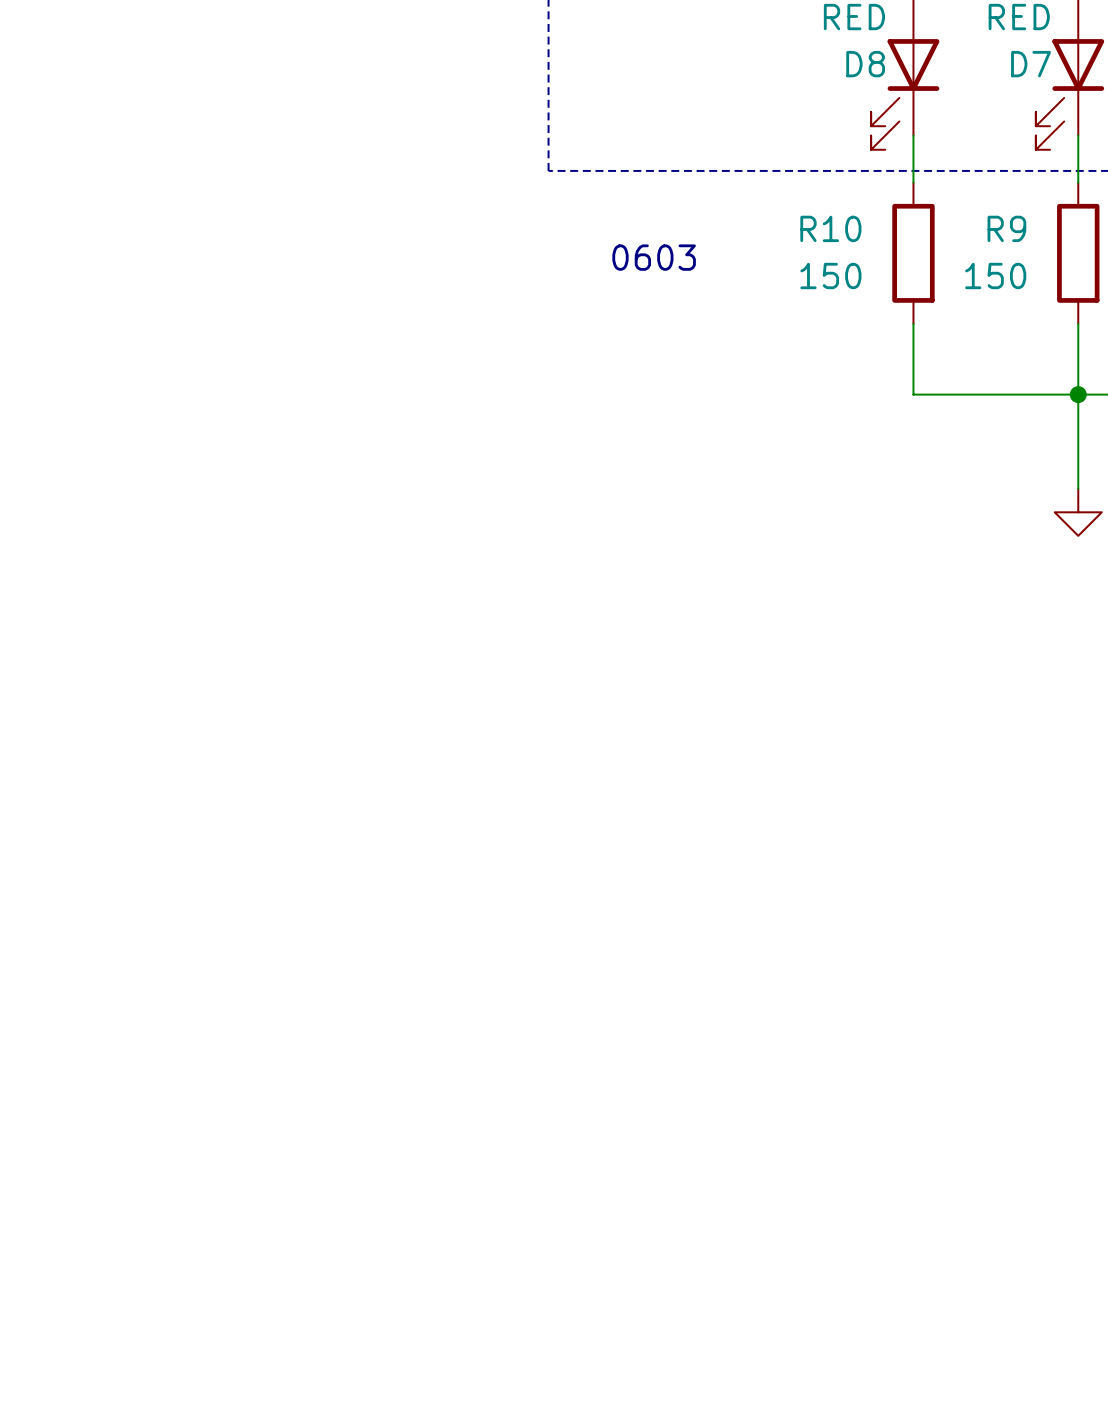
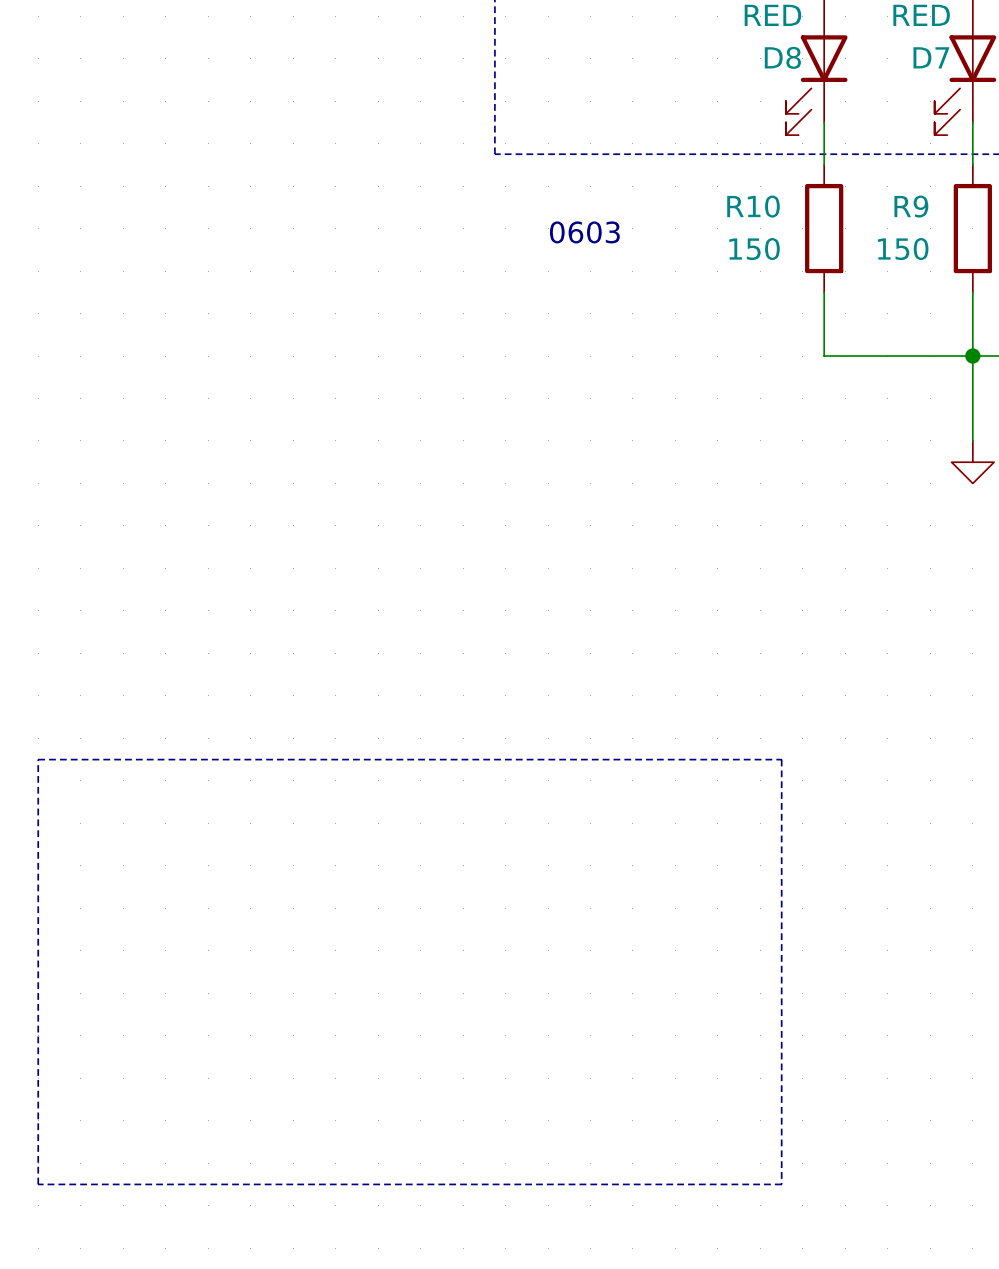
line: none -> (38, 759) (781, 759) (781, 1184) (38, 1184) (38, 759)

